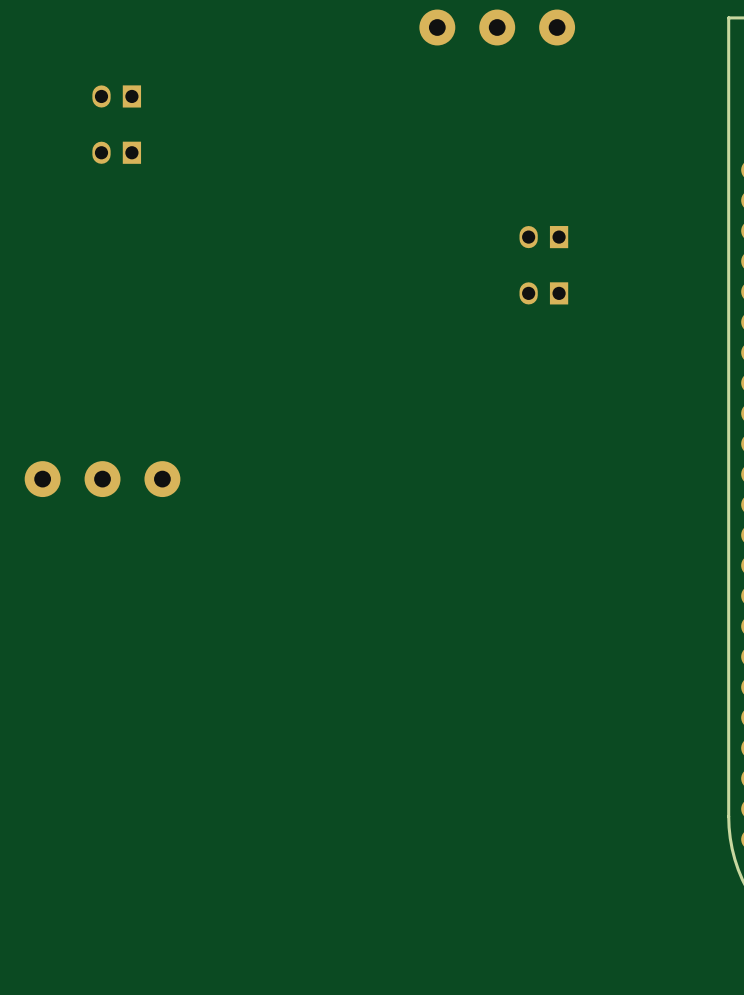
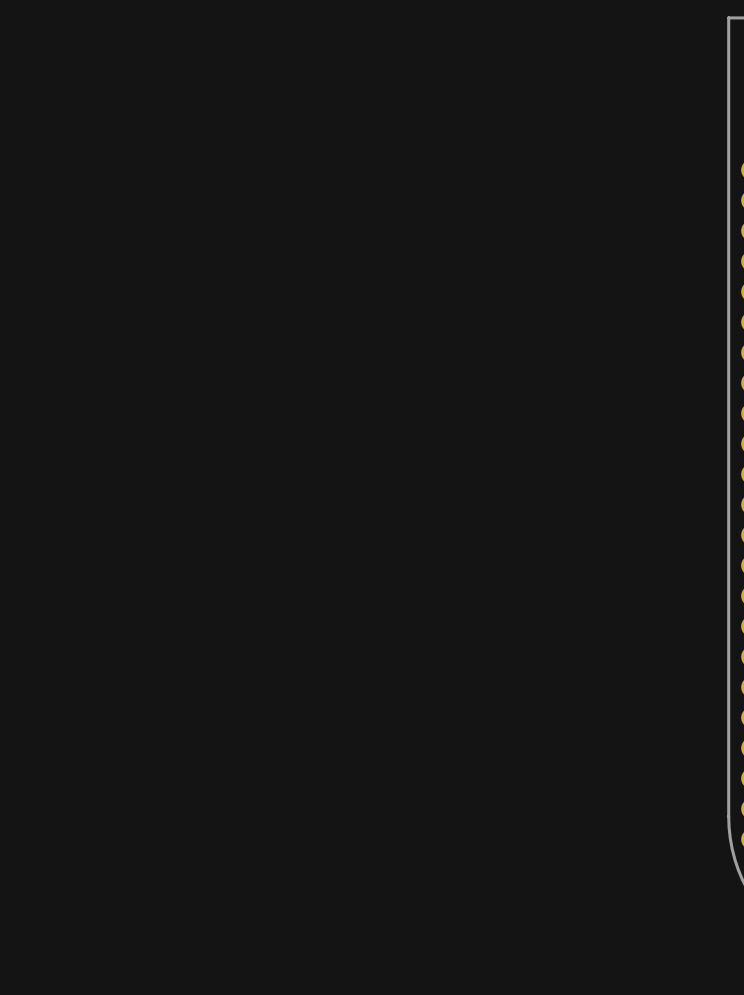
part: (497, 27) -> none
part: (116, 96) -> none
part: (116, 152) -> none
part: (543, 237) -> none
part: (543, 293) -> none
part: (102, 479) -> none

